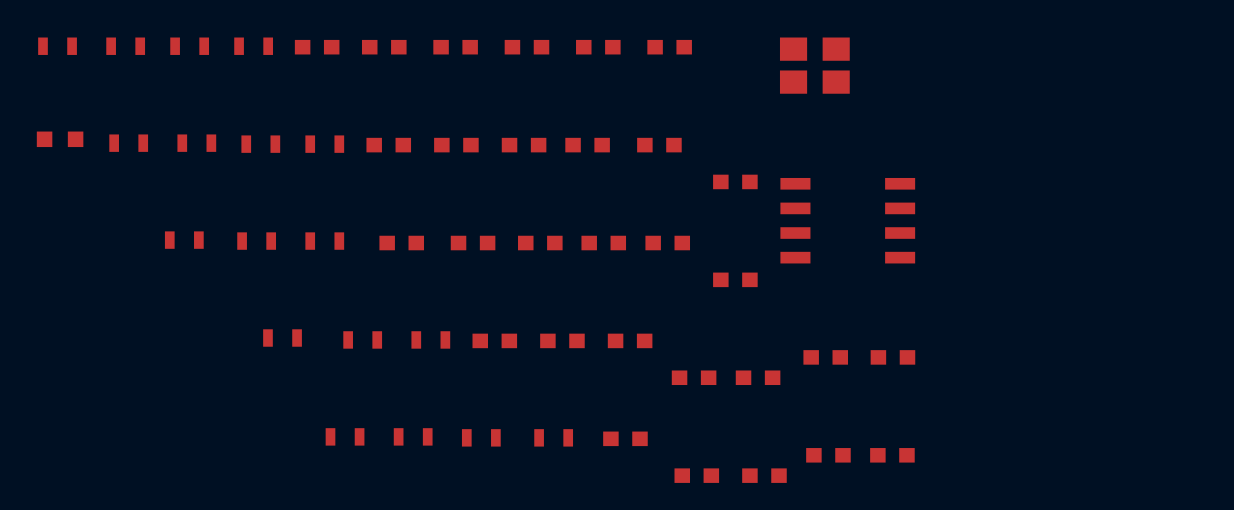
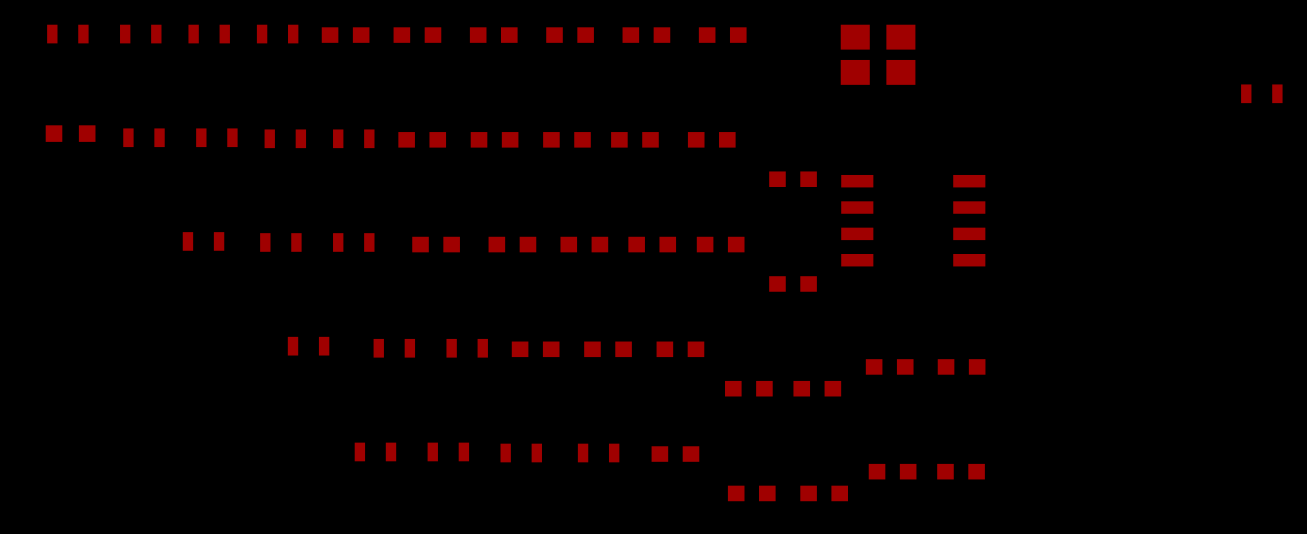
part: none -> (1261, 93)

